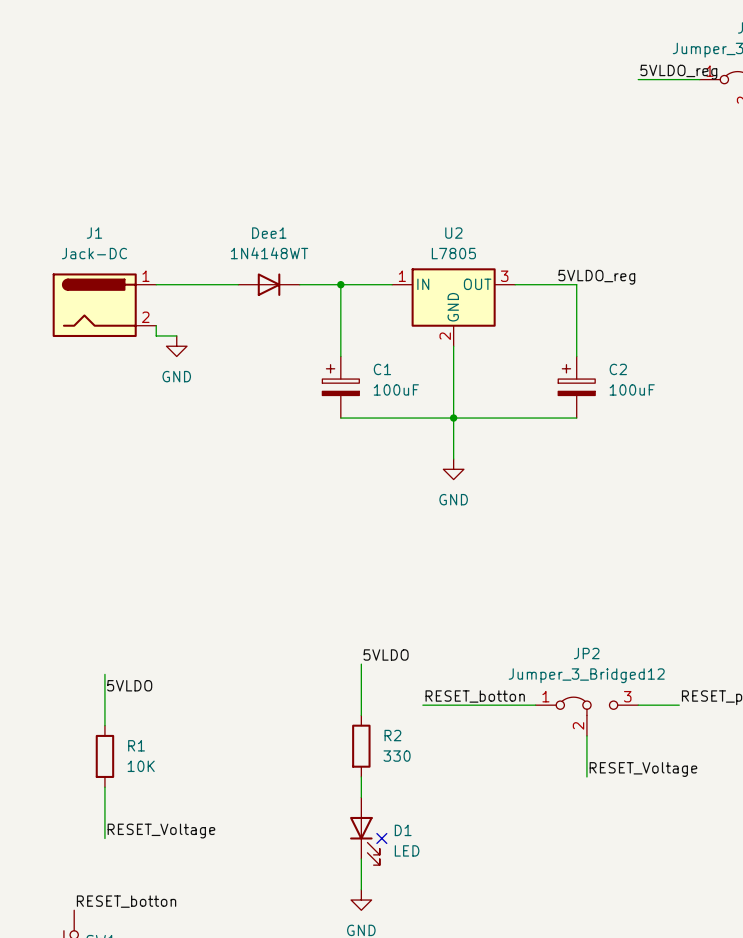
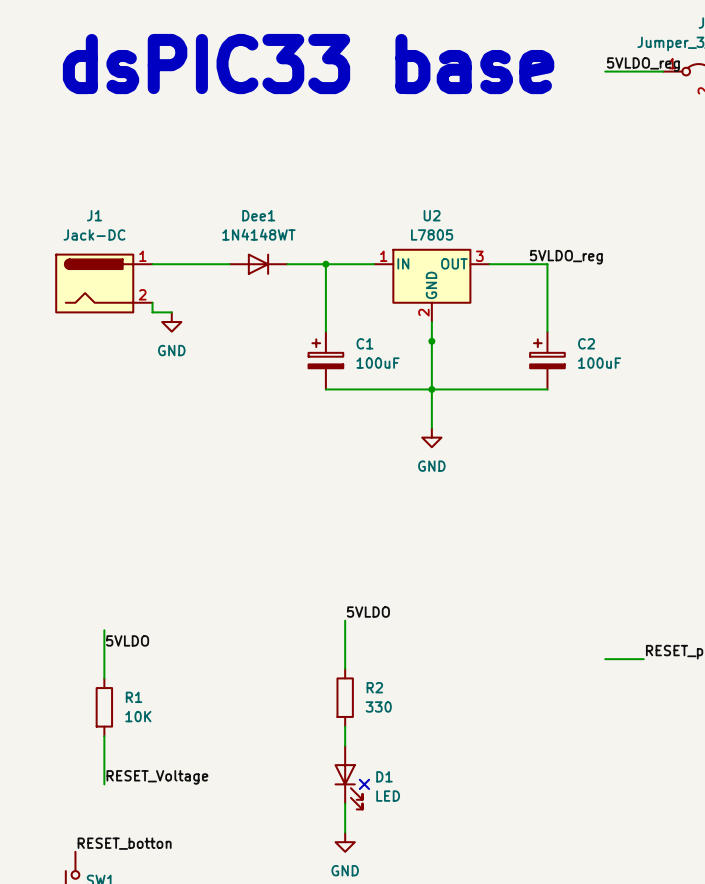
text: none -> dsPIC33 base (308, 64)
junction: none -> (431, 341)
label: RESET_botton (475, 696) -> none
wire: (422, 705) (535, 705) -> none
JP2: Jumper_3_Bridged12 (586, 716) -> none
wire: (586, 735) (586, 776) -> none
label: RESET_Voltage (643, 769) -> none

